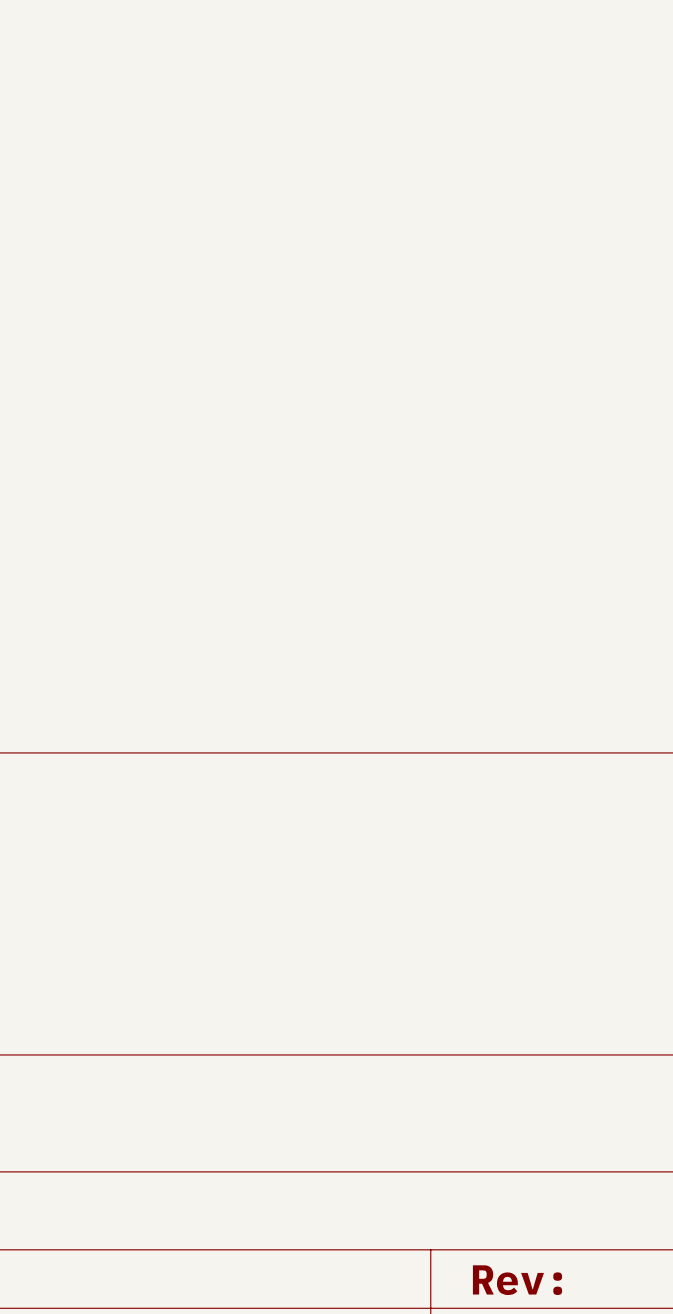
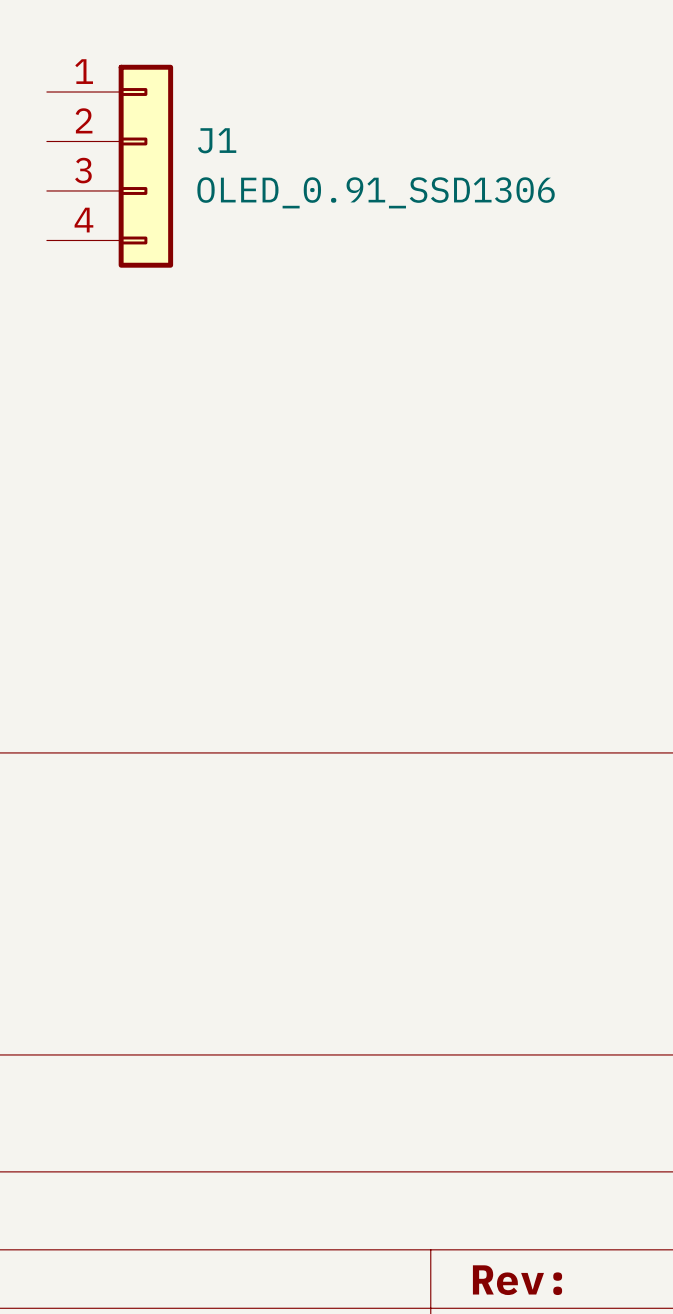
J1: none -> OLED_0.91_SSD1306 (110, 166)

